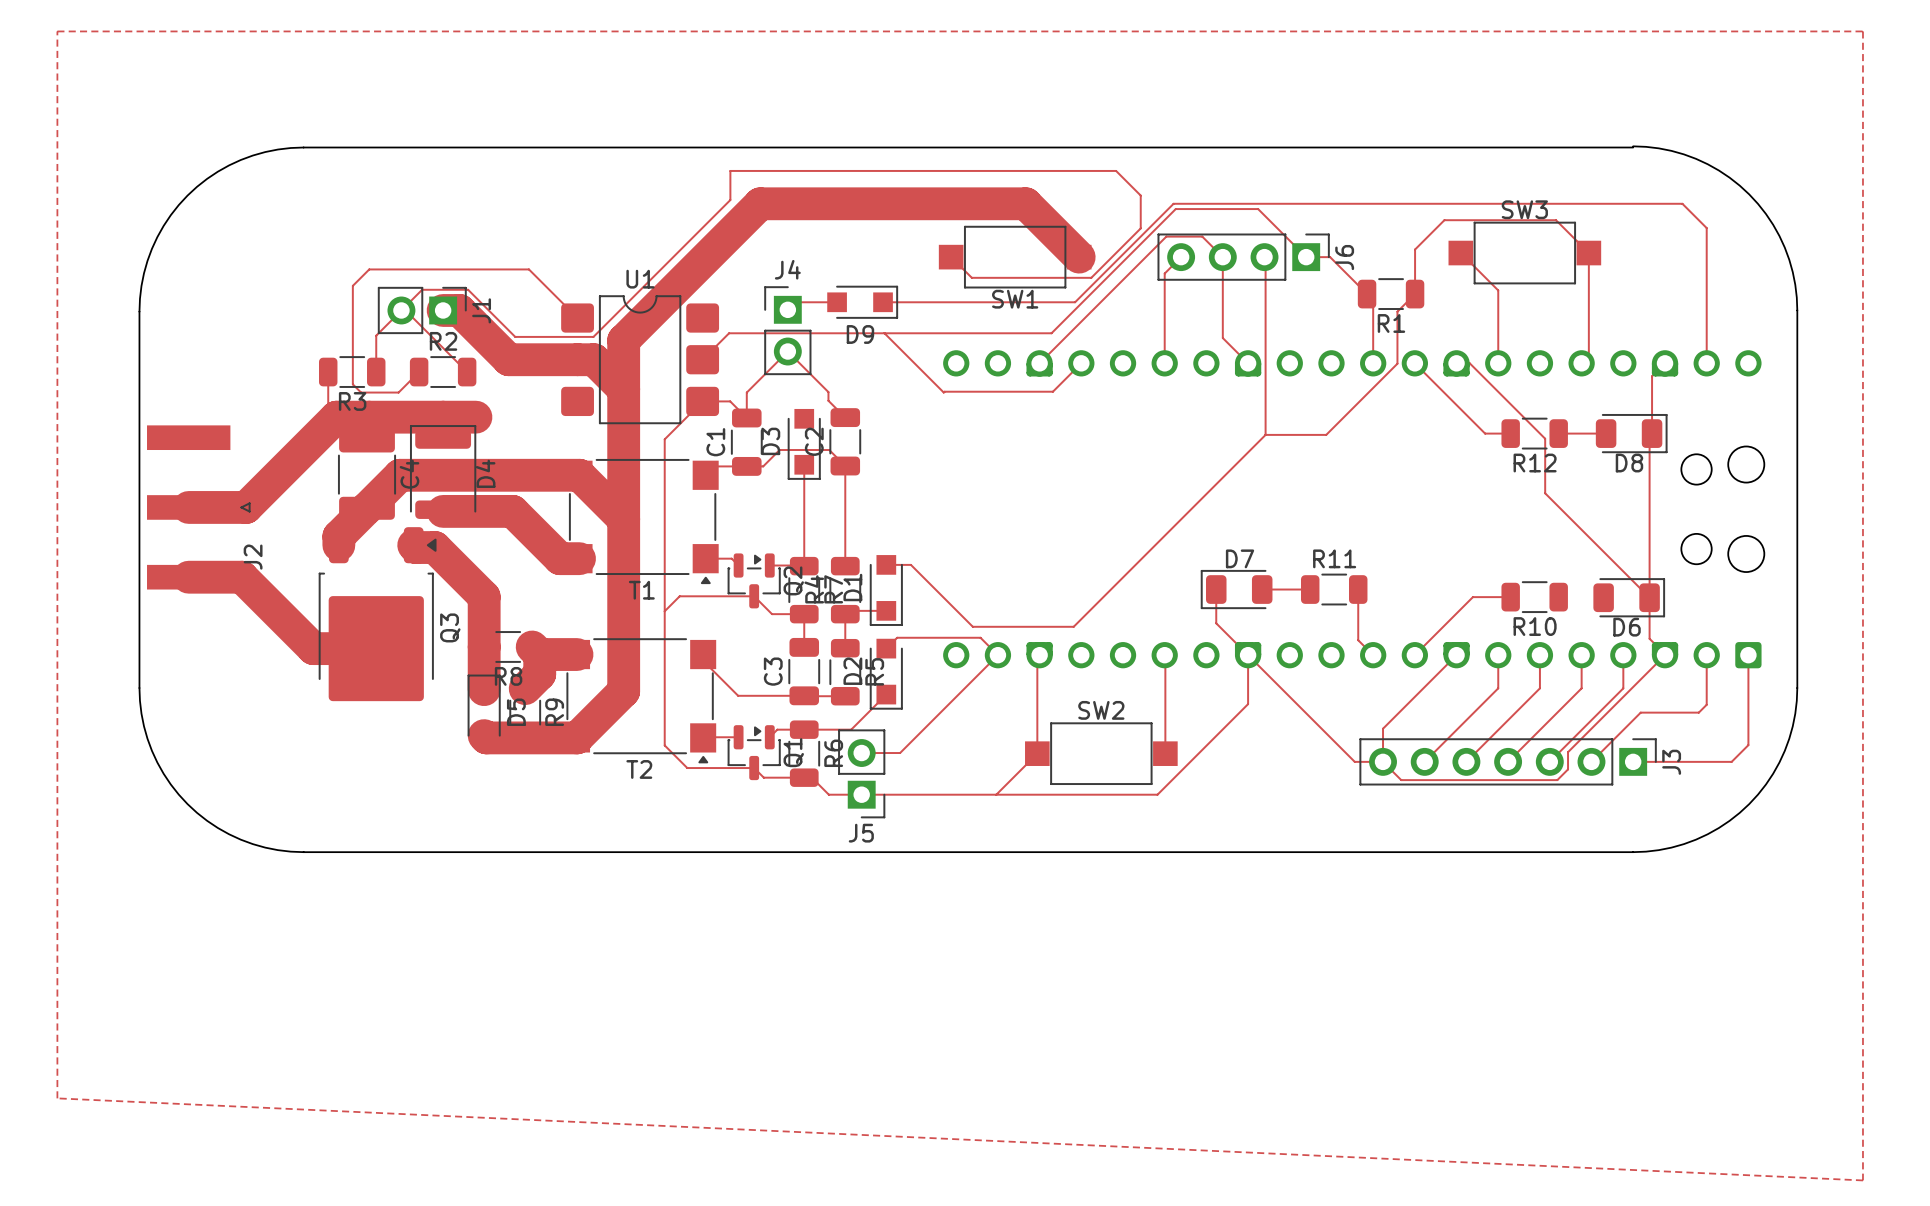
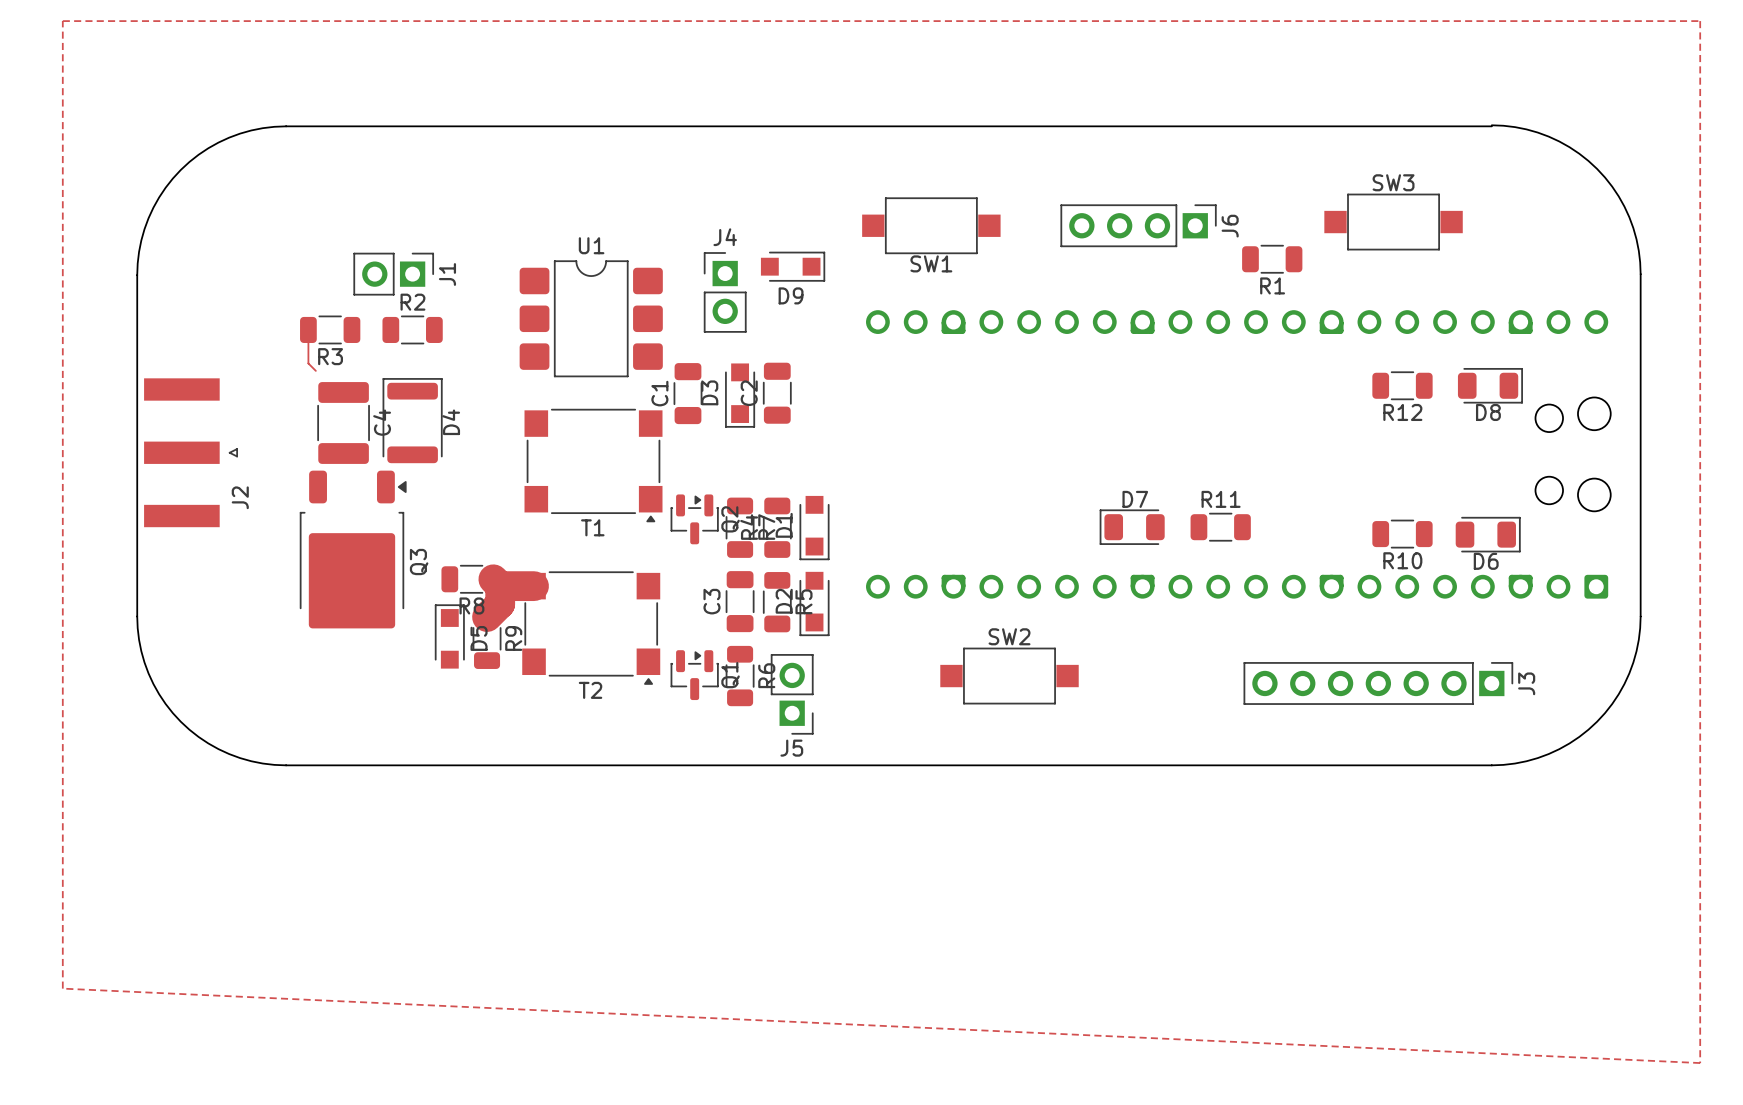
track: (1460, 253) (1498, 290) (1498, 363) -> none
track: (951, 257) (971, 277) (1091, 277) (1140, 228) (1140, 195) (1116, 170) (730, 170) (730, 200) (593, 336) (515, 336) (468, 289) (422, 289) (376, 335) (376, 372) -> none
track: (1079, 257) (1025, 203) (760, 203) (623, 340) (623, 691) (577, 737) (486, 737) (484, 735) -> none
track: (1181, 257) (1164, 273) (1164, 363) -> none
track: (1264, 257) (1265, 434) -> none
track: (837, 302) (795, 302) (787, 309) -> none
track: (883, 302) (1075, 302) (1173, 203) (1682, 203) (1706, 228) (1706, 363) -> none
track: (401, 310) (405, 310) (467, 372) -> none
track: (443, 310) (459, 310) (508, 359) (593, 359) (623, 389) -> none
track: (577, 318) (528, 269) (369, 269) (352, 285) (352, 384) (361, 392) (398, 392) (419, 372) -> none
track: (884, 333) (943, 392) (1052, 391) (1081, 363) -> none
track: (702, 359) (729, 333) (1051, 333) (1175, 209) (1258, 209) (1306, 257) (1330, 257) (1373, 300) (1373, 363) -> none
track: (1039, 363) (1166, 236) (1202, 236) (1222, 257) (1222, 338) (1248, 363) -> none
track: (1414, 363) (1485, 433) (1510, 433) -> none
track: (1456, 363) (1469, 363) (1545, 438) (1545, 493) (1649, 597) -> none
track: (1581, 363) (1588, 356) (1588, 253) (1556, 220) (1444, 220) (1415, 249) (1415, 294) (1397, 311) (1397, 363) (1326, 434) (1265, 434) -> none
track: (1665, 363) (1652, 376) (1652, 436) (1649, 438) (1649, 638) (1665, 655) (1568, 752) (1568, 769) (1557, 780) (1401, 780) (1383, 761) -> none
track: (475, 417) (336, 417) (246, 507) (188, 507) -> none
track: (845, 417) (828, 400) (828, 392) (787, 351) (746, 392) (746, 417) (730, 401) (702, 401) (664, 439) (664, 745) (687, 768) (754, 768) (763, 777) (811, 777) (828, 794) (1157, 794) (1248, 704) (1248, 655) -> none
track: (1558, 433) (1606, 433) -> none
track: (1265, 434) (1073, 626) (972, 626) (910, 564) (886, 564) -> none
track: (804, 464) (804, 566) (769, 565) -> none
track: (705, 475) (714, 466) (763, 466) (779, 450) (829, 450) (845, 466) (845, 566) -> none
track: (443, 511) (512, 511) (560, 558) (579, 558) -> none
track: (623, 519) (579, 475) (400, 475) (338, 536) (338, 545) -> none
track: (413, 545) (416, 547) (434, 547) (484, 596) (484, 689) -> none
track: (705, 558) (731, 558) (738, 565) -> none
track: (188, 577) (242, 577) (313, 648) (376, 648) -> none
track: (1216, 589) (1216, 623) (1354, 761) (1383, 761) -> none
track: (1262, 589) (1310, 589) -> none
track: (1358, 589) (1358, 640) (1373, 655) -> none
track: (1510, 597) (1472, 597) (1414, 655) -> none
track: (886, 610) (848, 610) (845, 614) (845, 648) -> none
track: (664, 611) (679, 596) (754, 596) (772, 614) (804, 614) (804, 647) -> none
track: (886, 648) (897, 637) (980, 637) (997, 655) (900, 753) (861, 753) -> none
track: (703, 654) (703, 660) (738, 695) (845, 696) -> none
track: (1039, 655) (1037, 657) (1037, 753) (996, 794) -> none
track: (1164, 655) (1165, 753) -> none
track: (1456, 655) (1383, 728) (1383, 761) -> none
track: (1498, 655) (1498, 688) (1424, 761) -> none
track: (1539, 655) (1539, 688) (1466, 761) -> none
track: (1581, 655) (1581, 688) (1508, 761) -> none
track: (1623, 655) (1623, 688) (1549, 761) -> none
track: (1706, 655) (1706, 704) (1698, 712) (1640, 712) (1591, 761) -> none
track: (1748, 655) (1748, 745) (1731, 761) (1633, 761) -> none
track: (886, 694) (851, 729) (777, 729) (769, 737) -> none
track: (738, 737) (703, 737) -> none

